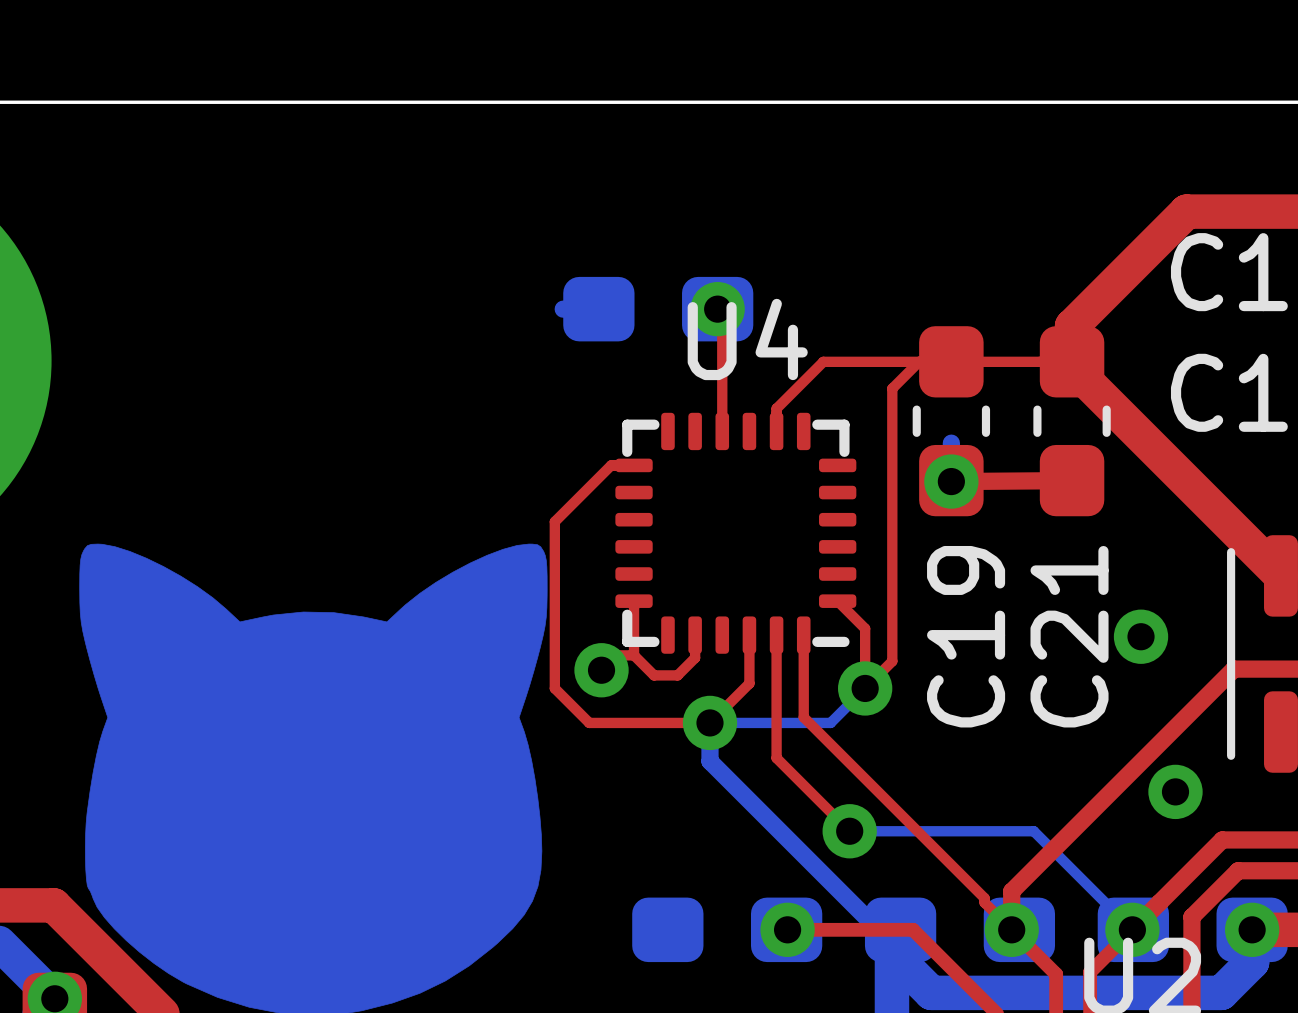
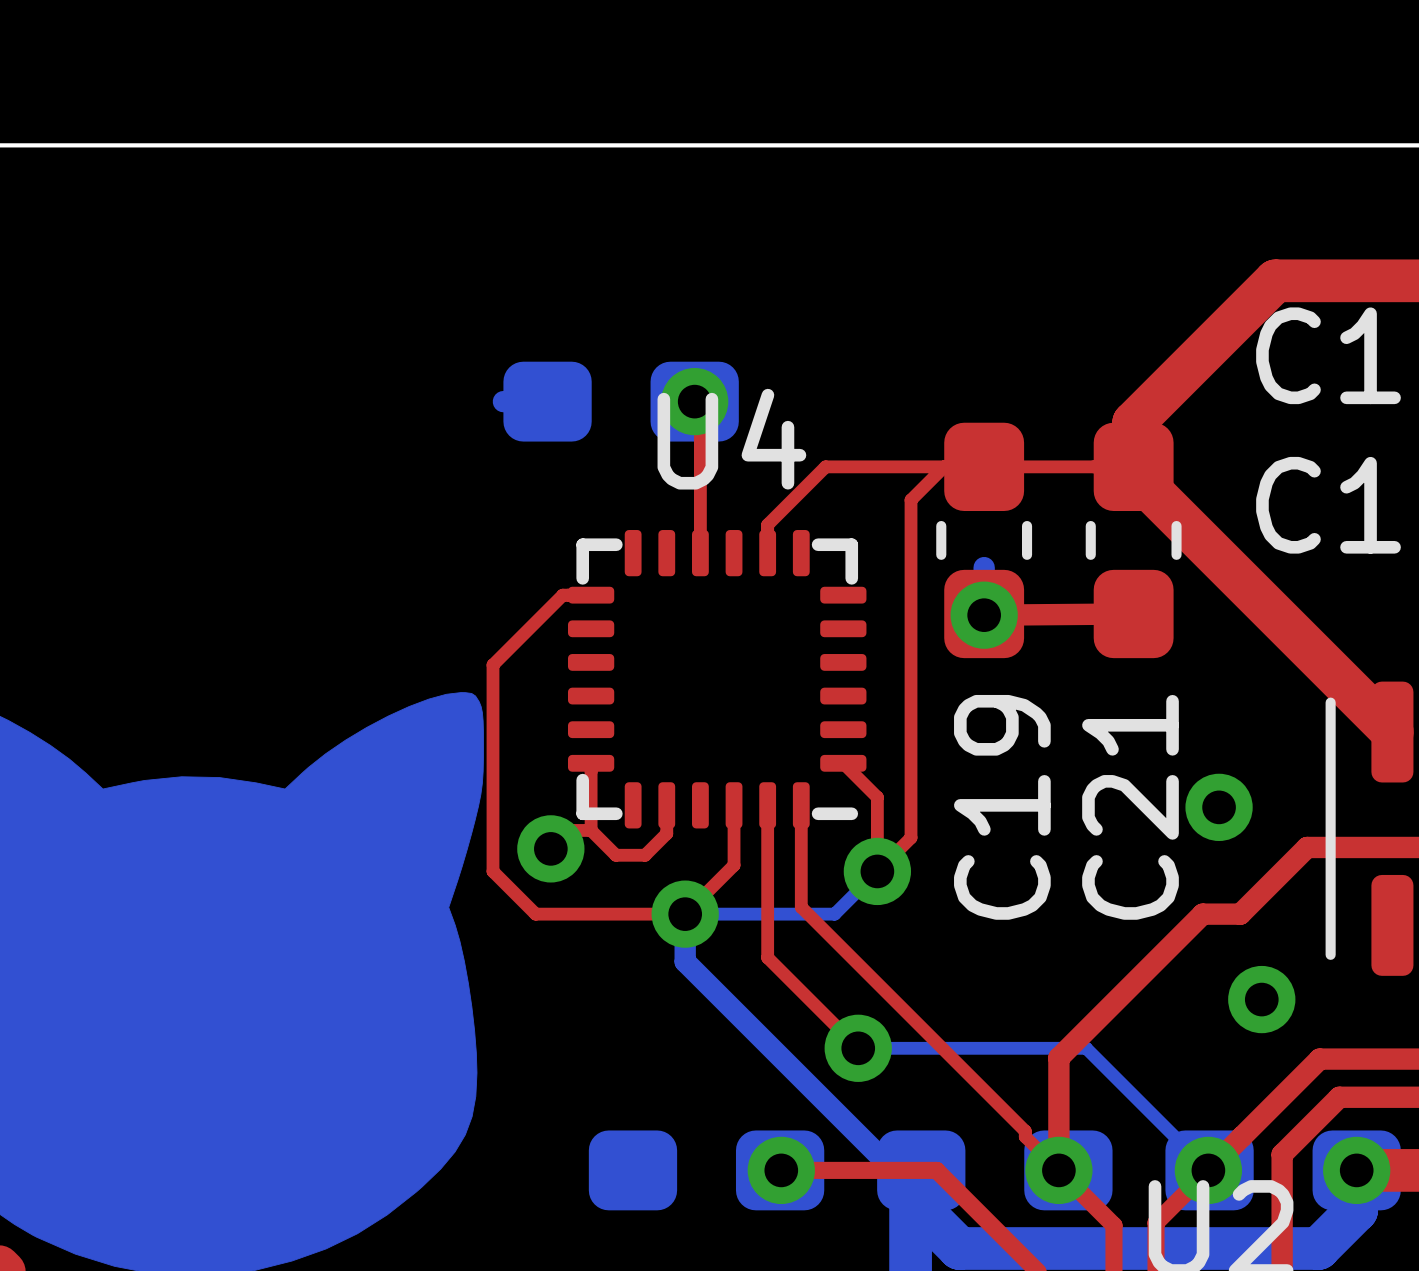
top track: (1234, 669) (1011, 891) -> (1334, 847) (1307, 847) (1240, 914) (1202, 914) (1058, 1057) (1058, 1122)

